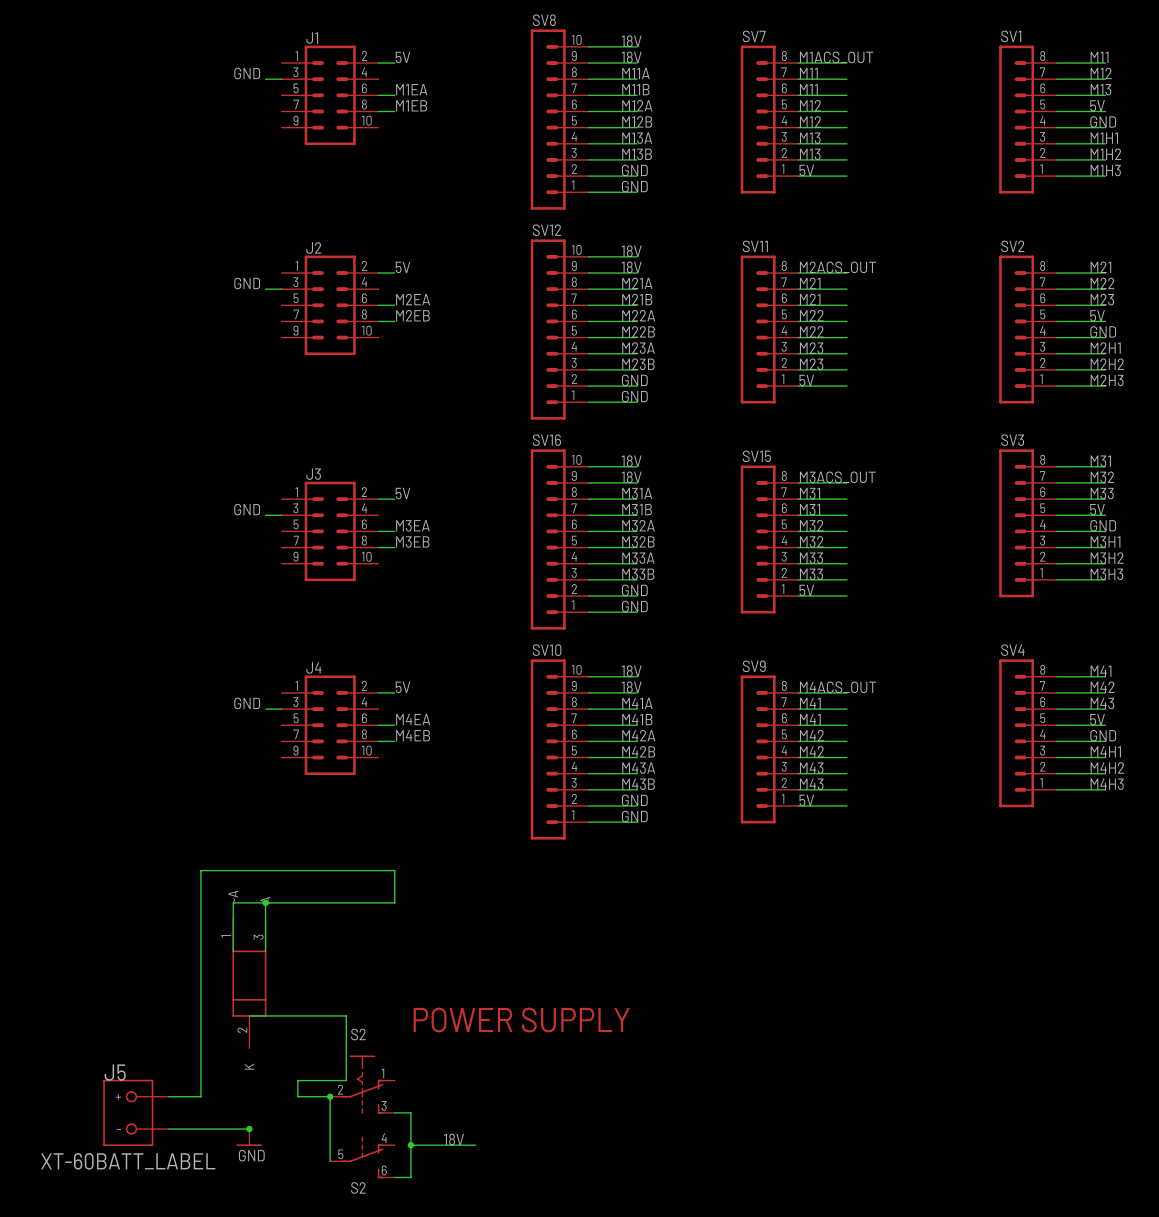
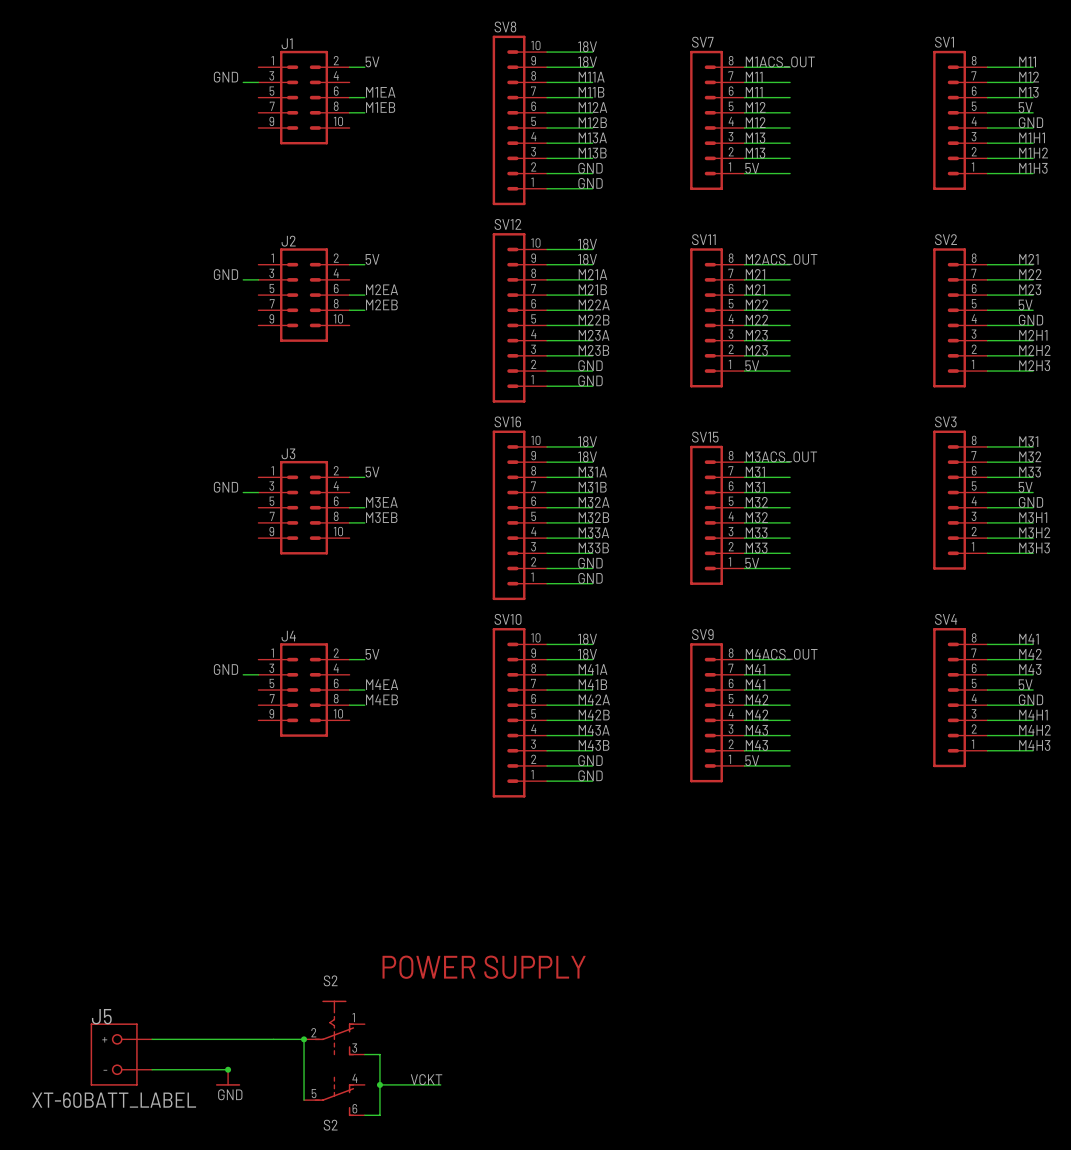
wire: (265, 902) (265, 951) -> none
junction: (265, 902) -> none
wire: (233, 951) (233, 902) (394, 902) (394, 870) (200, 870) (200, 1096) -> none
part: (249, 983) -> none
wire: (249, 1015) (346, 1015) (346, 1080) (297, 1080) (297, 1096) -> (182, 1039) (273, 1039)
label: 18V (454, 1139) -> VCKT (426, 1079)

